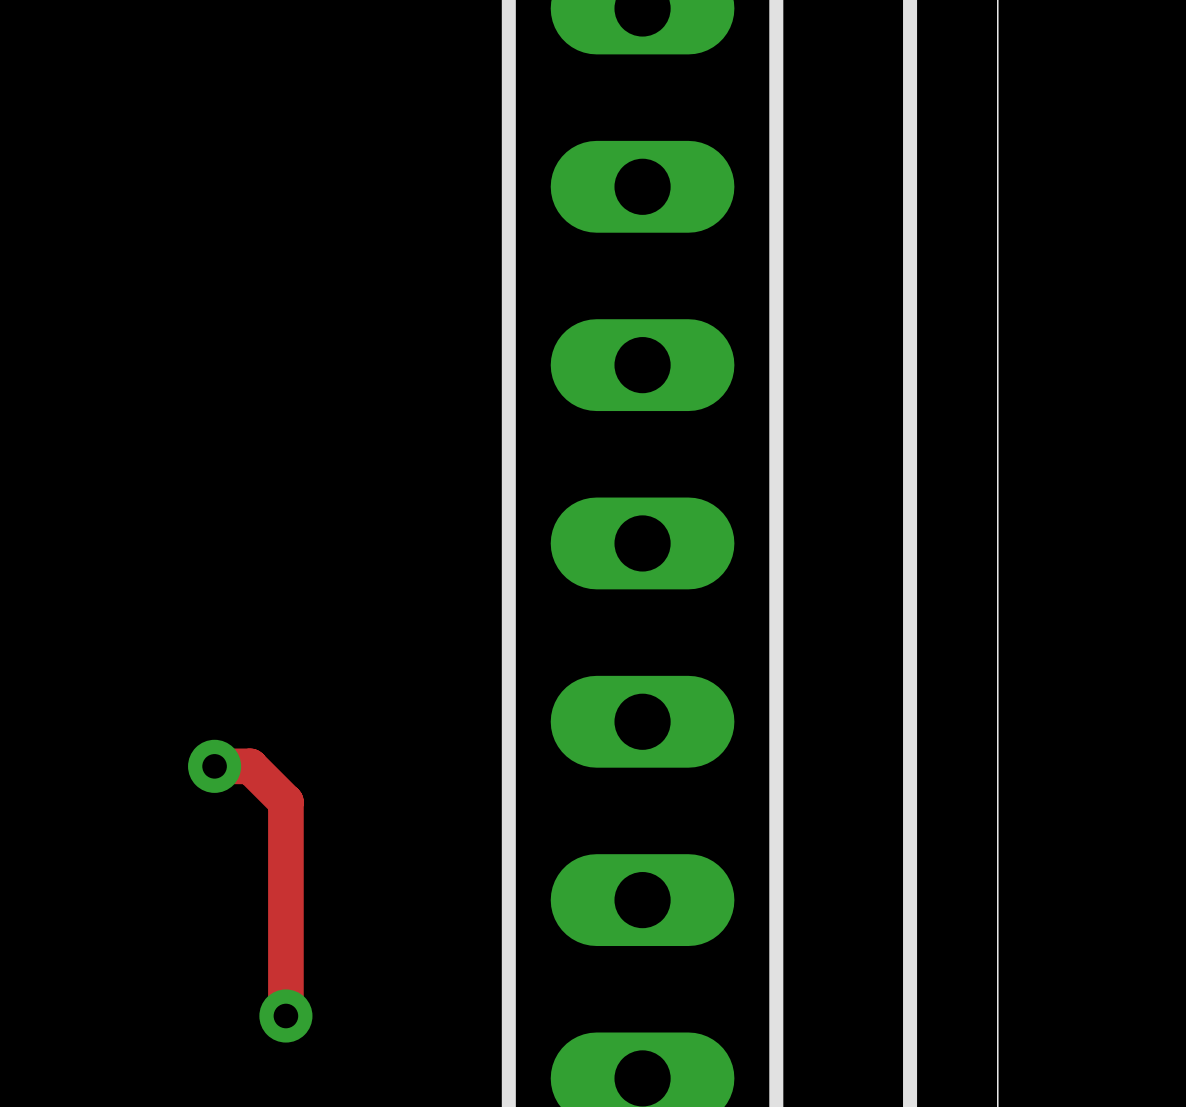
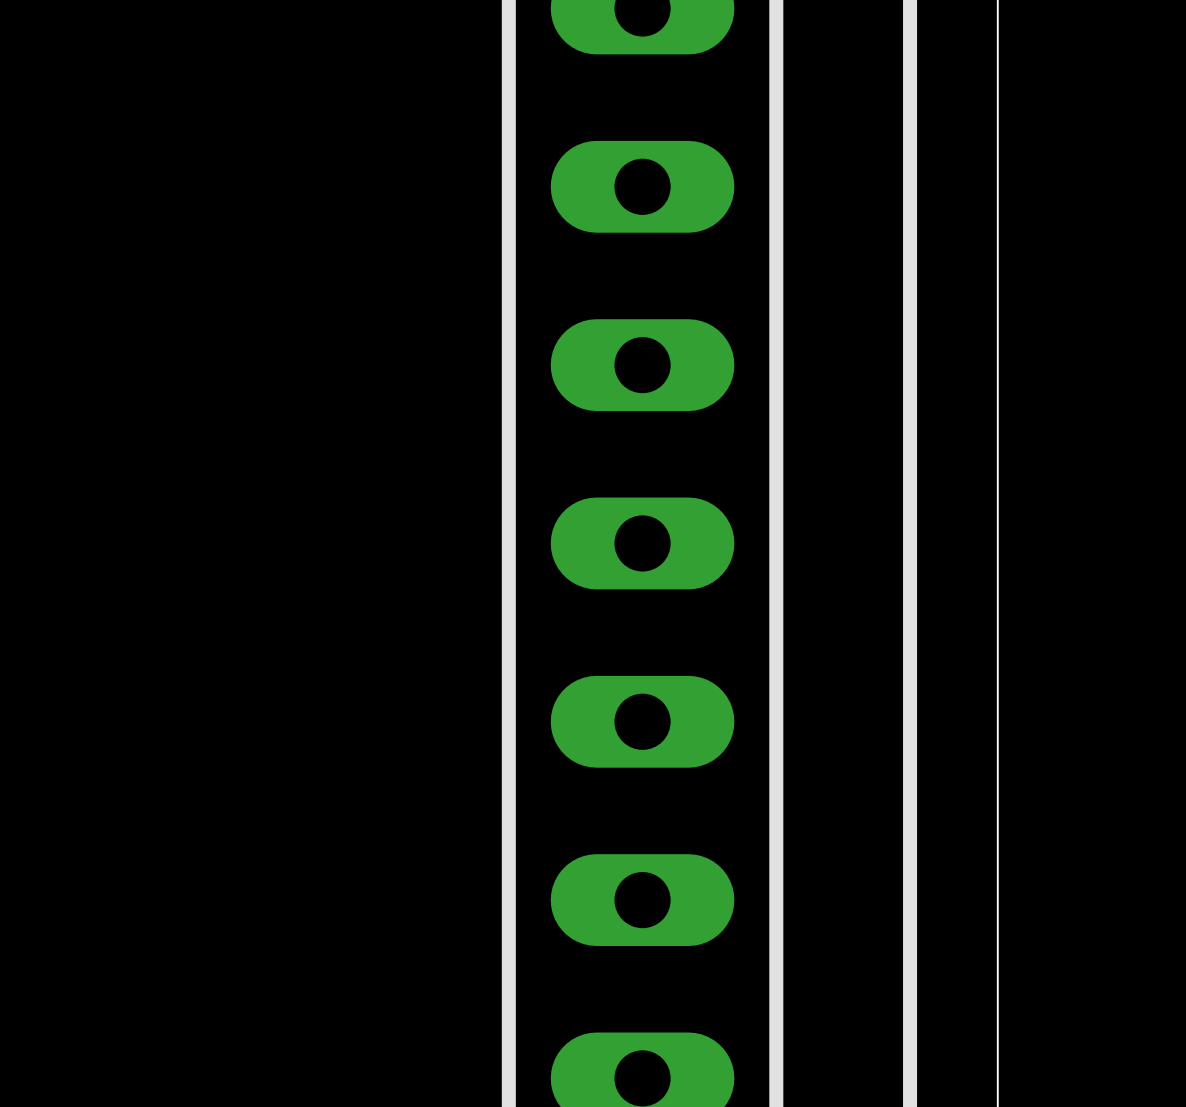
track: (214, 766) (250, 766) (285, 802) (285, 1016) -> none
via: (214, 766) -> none
via: (285, 1016) -> none

